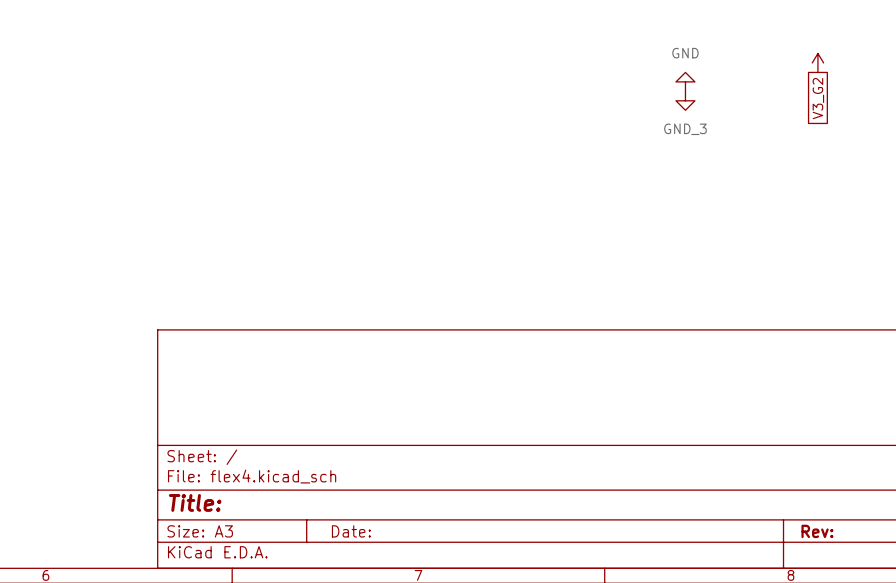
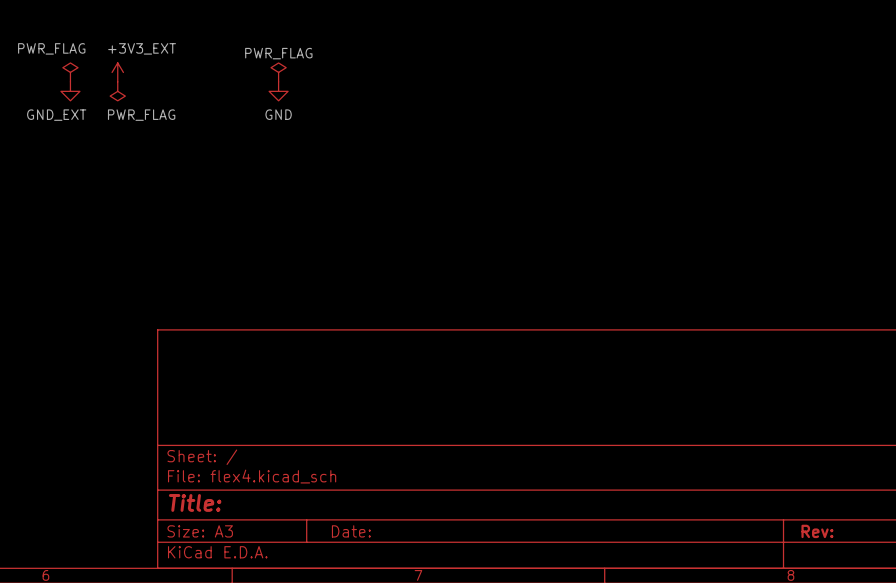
power symbol: (817, 62) -> none
power symbol: none -> PWR_FLAG (70, 72)
power symbol: none -> +3V3_EXT (117, 72)
power symbol: none -> PWR_FLAG (278, 72)
power symbol: GND (685, 81) -> none
power symbol: none -> GND_EXT (70, 91)
power symbol: none -> PWR_FLAG (117, 91)
power symbol: none -> GND (278, 91)
global label: V3_G2 (818, 98) -> none
power symbol: GND_3 (685, 100) -> none

